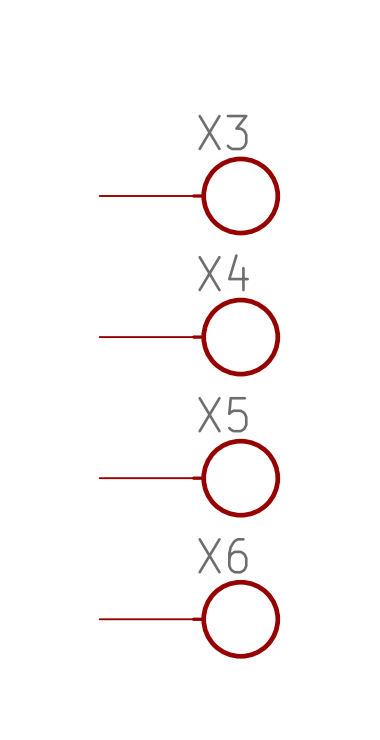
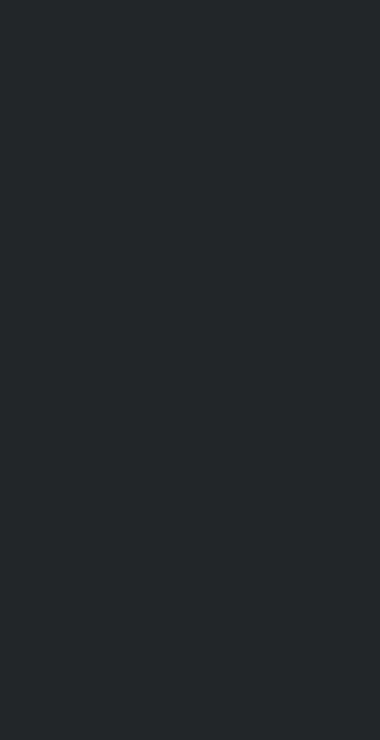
X3: (189, 195) -> none
X4: (189, 337) -> none
X5: (189, 478) -> none
X6: (189, 619) -> none

